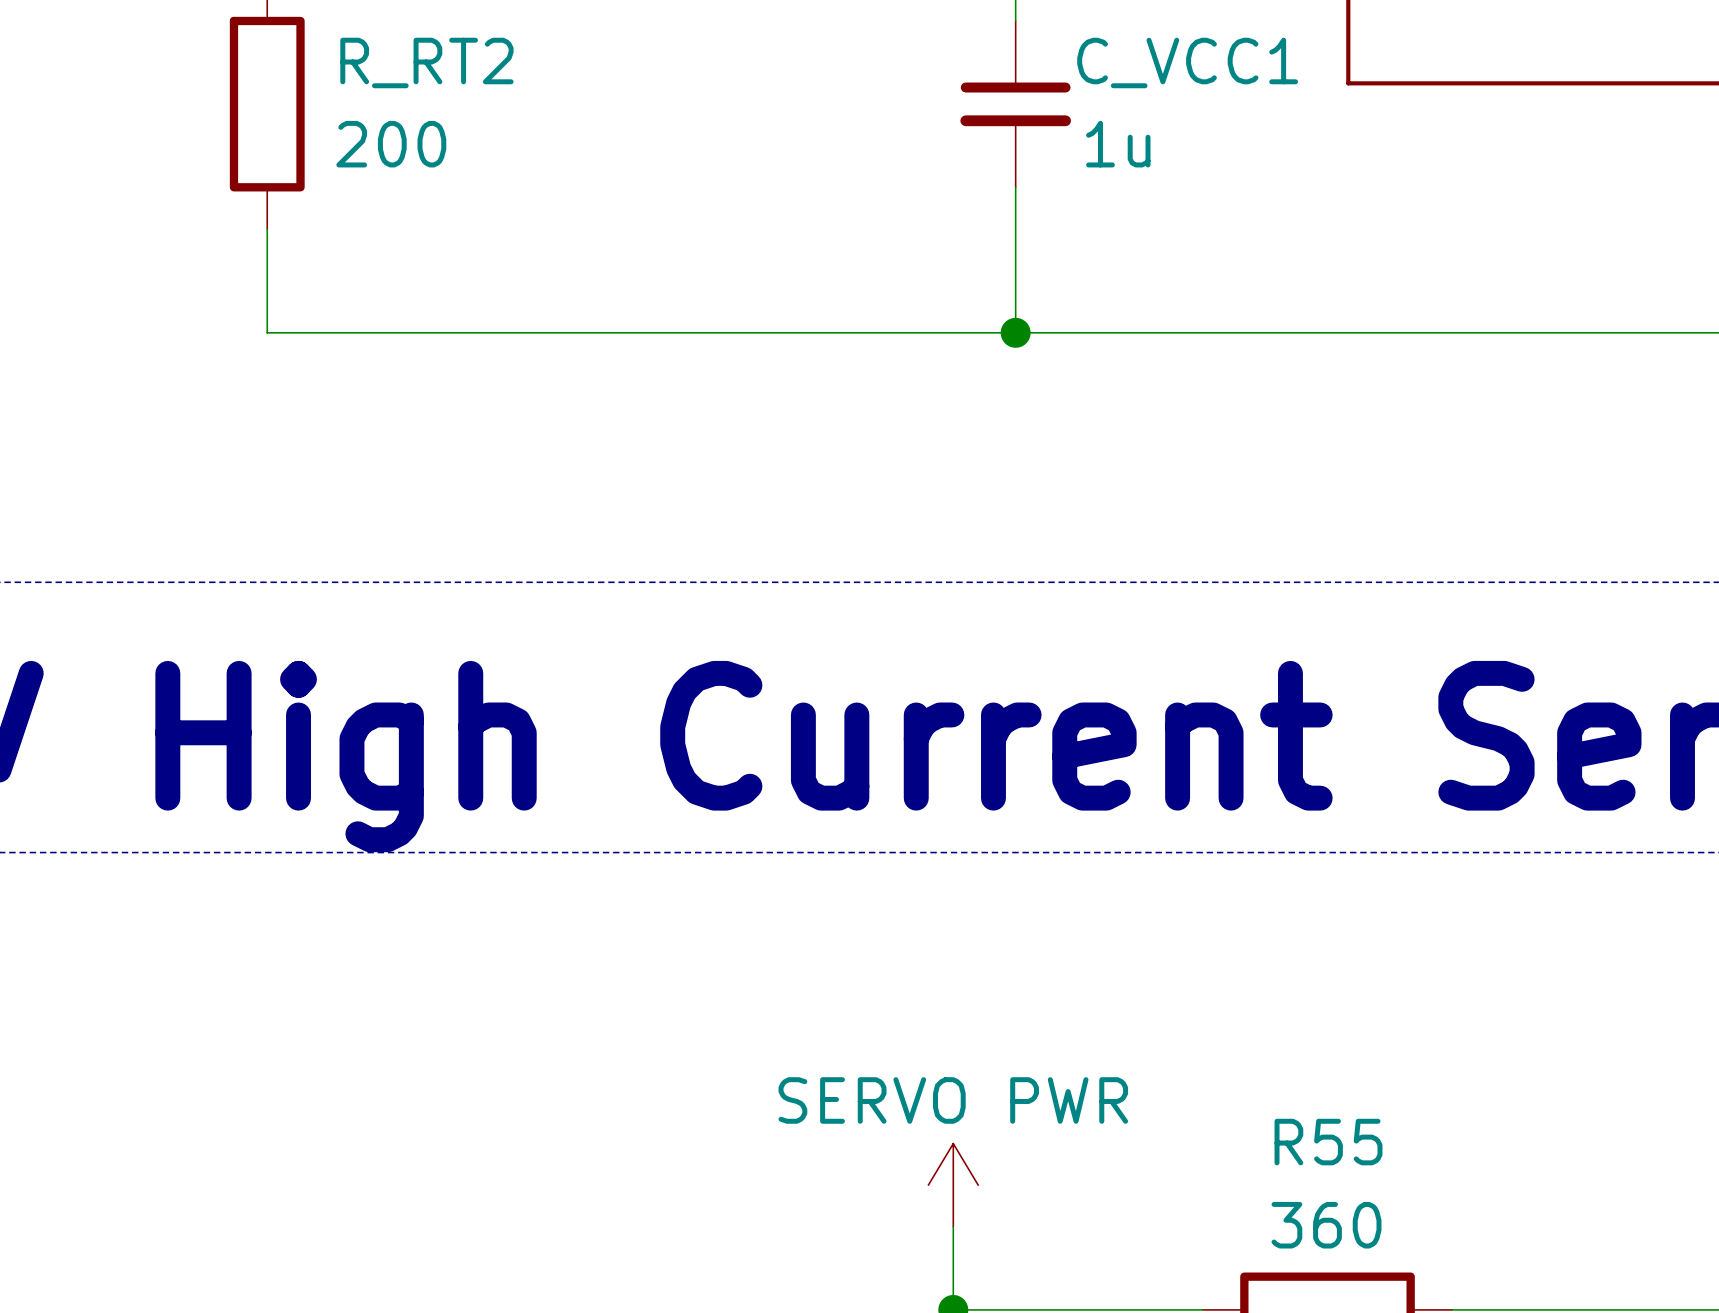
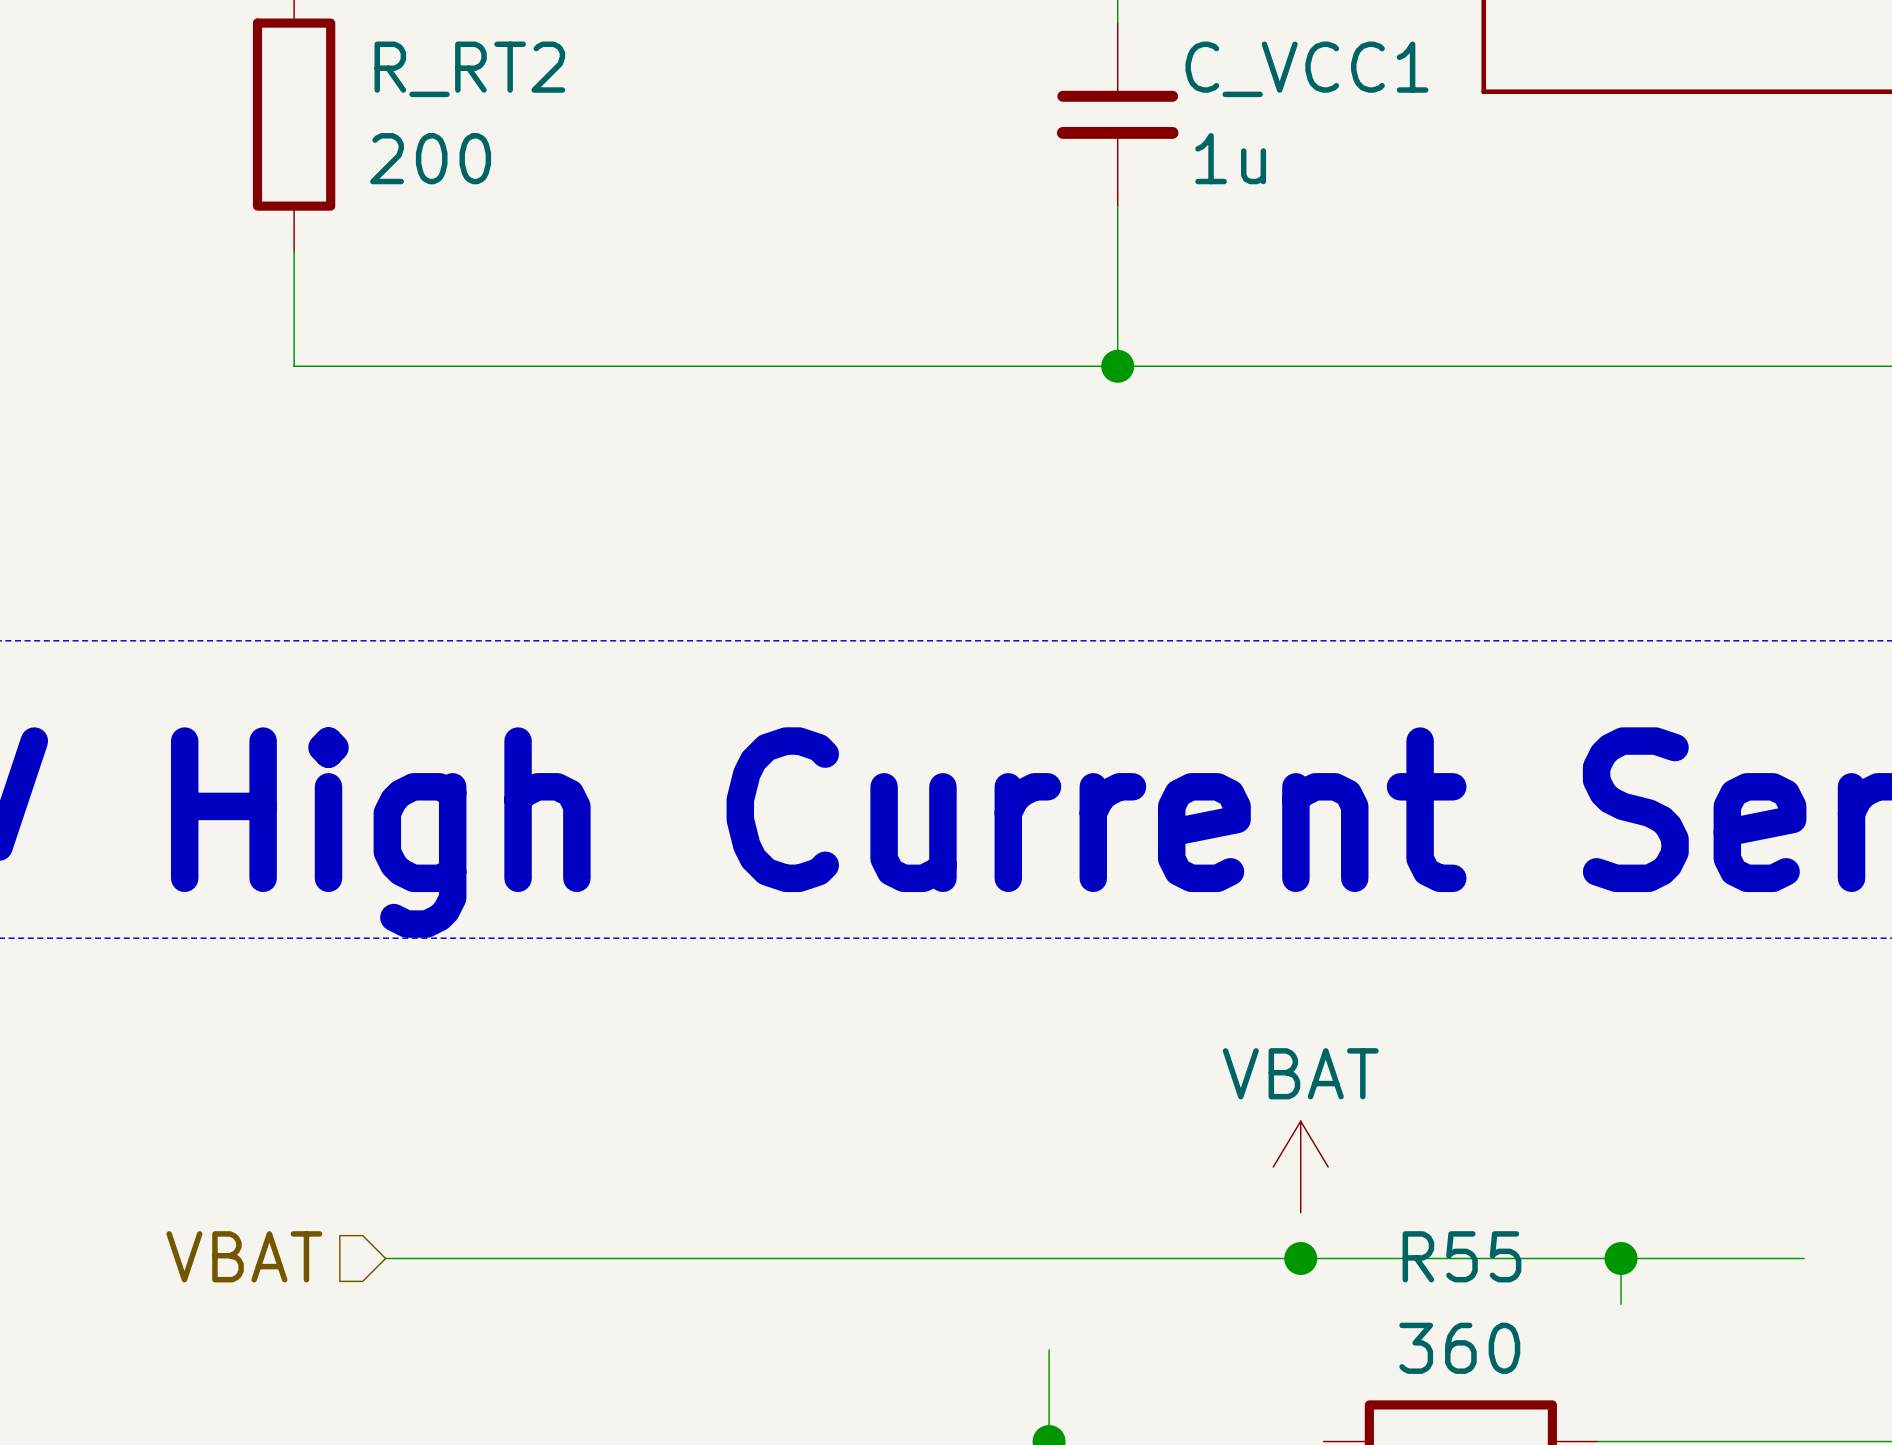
power symbol: none -> VBAT (1300, 1166)
hierarchical label: none -> VBAT (244, 1256)
wire: none -> (385, 1258) (1804, 1258)
junction: none -> (1300, 1258)
wire: none -> (1621, 1258) (1621, 1304)
junction: none -> (1621, 1258)
power symbol: SERVO PWR (953, 1185) -> none
wire: (953, 1309) (1202, 1309) -> none

